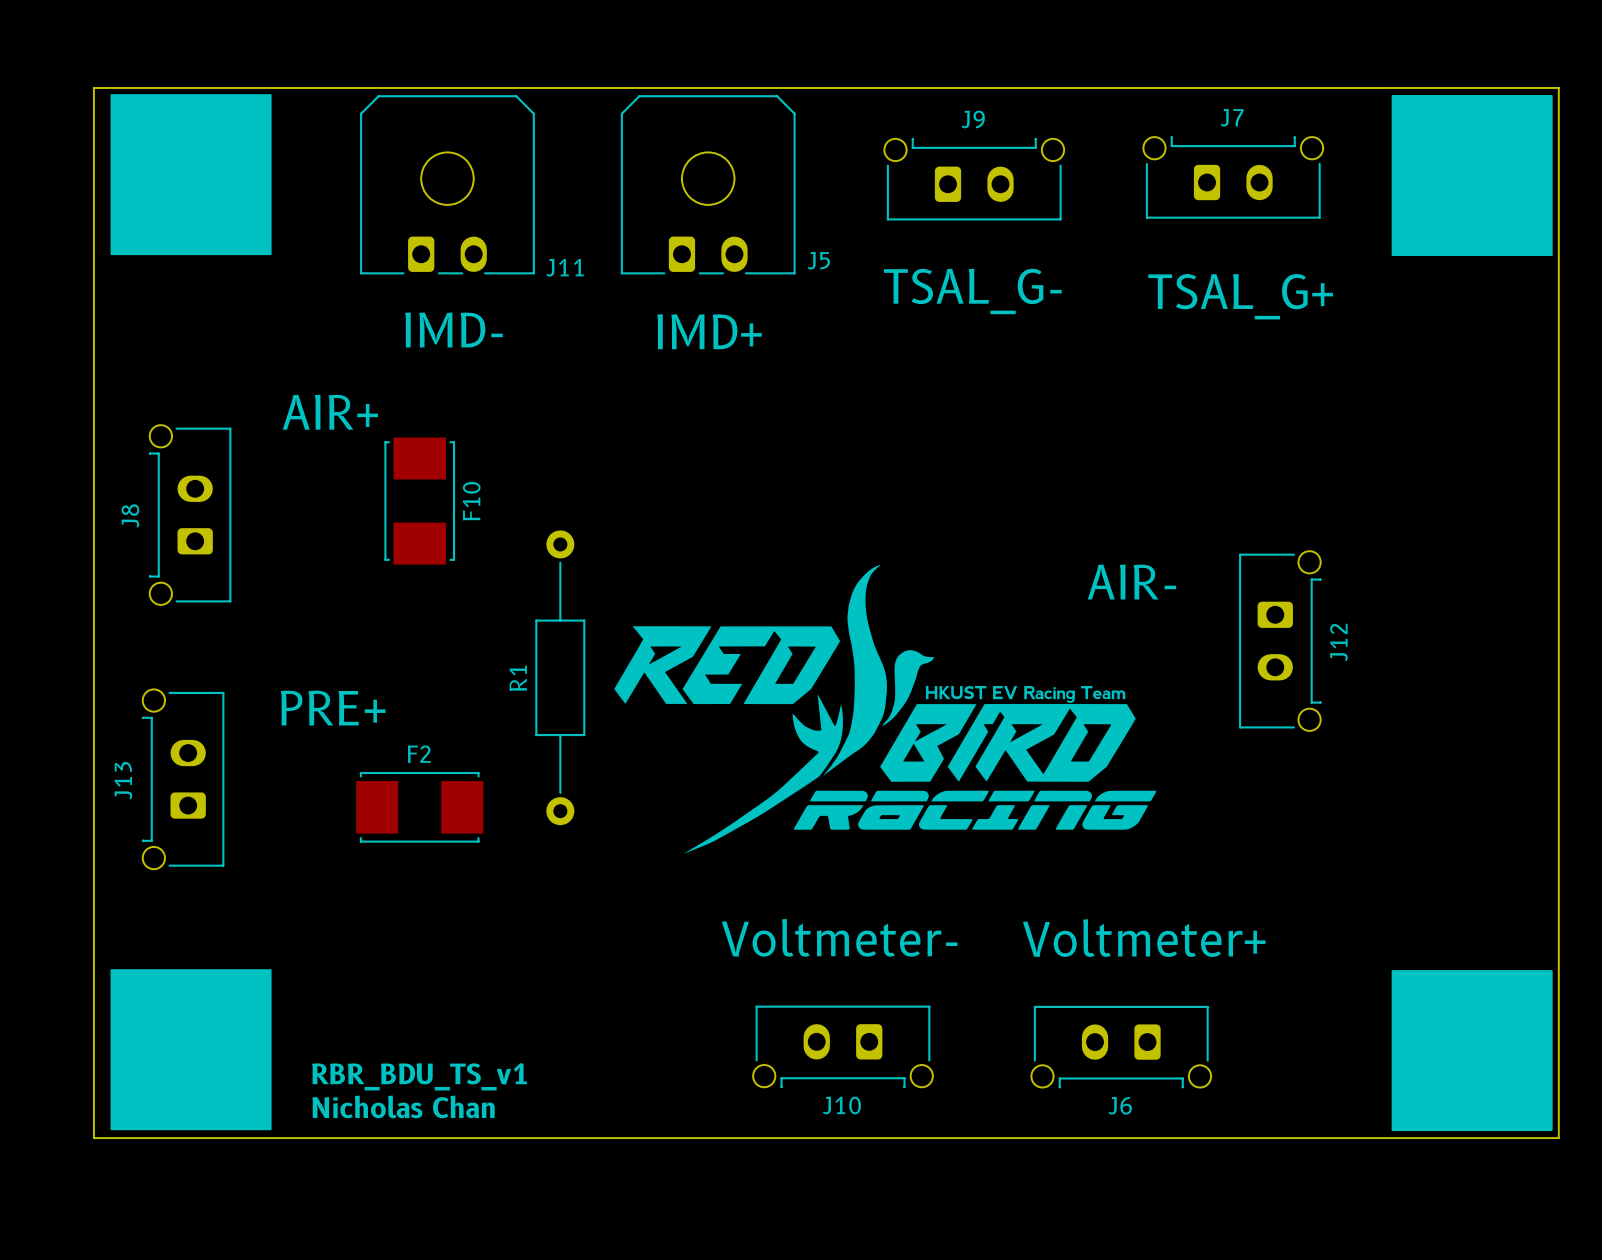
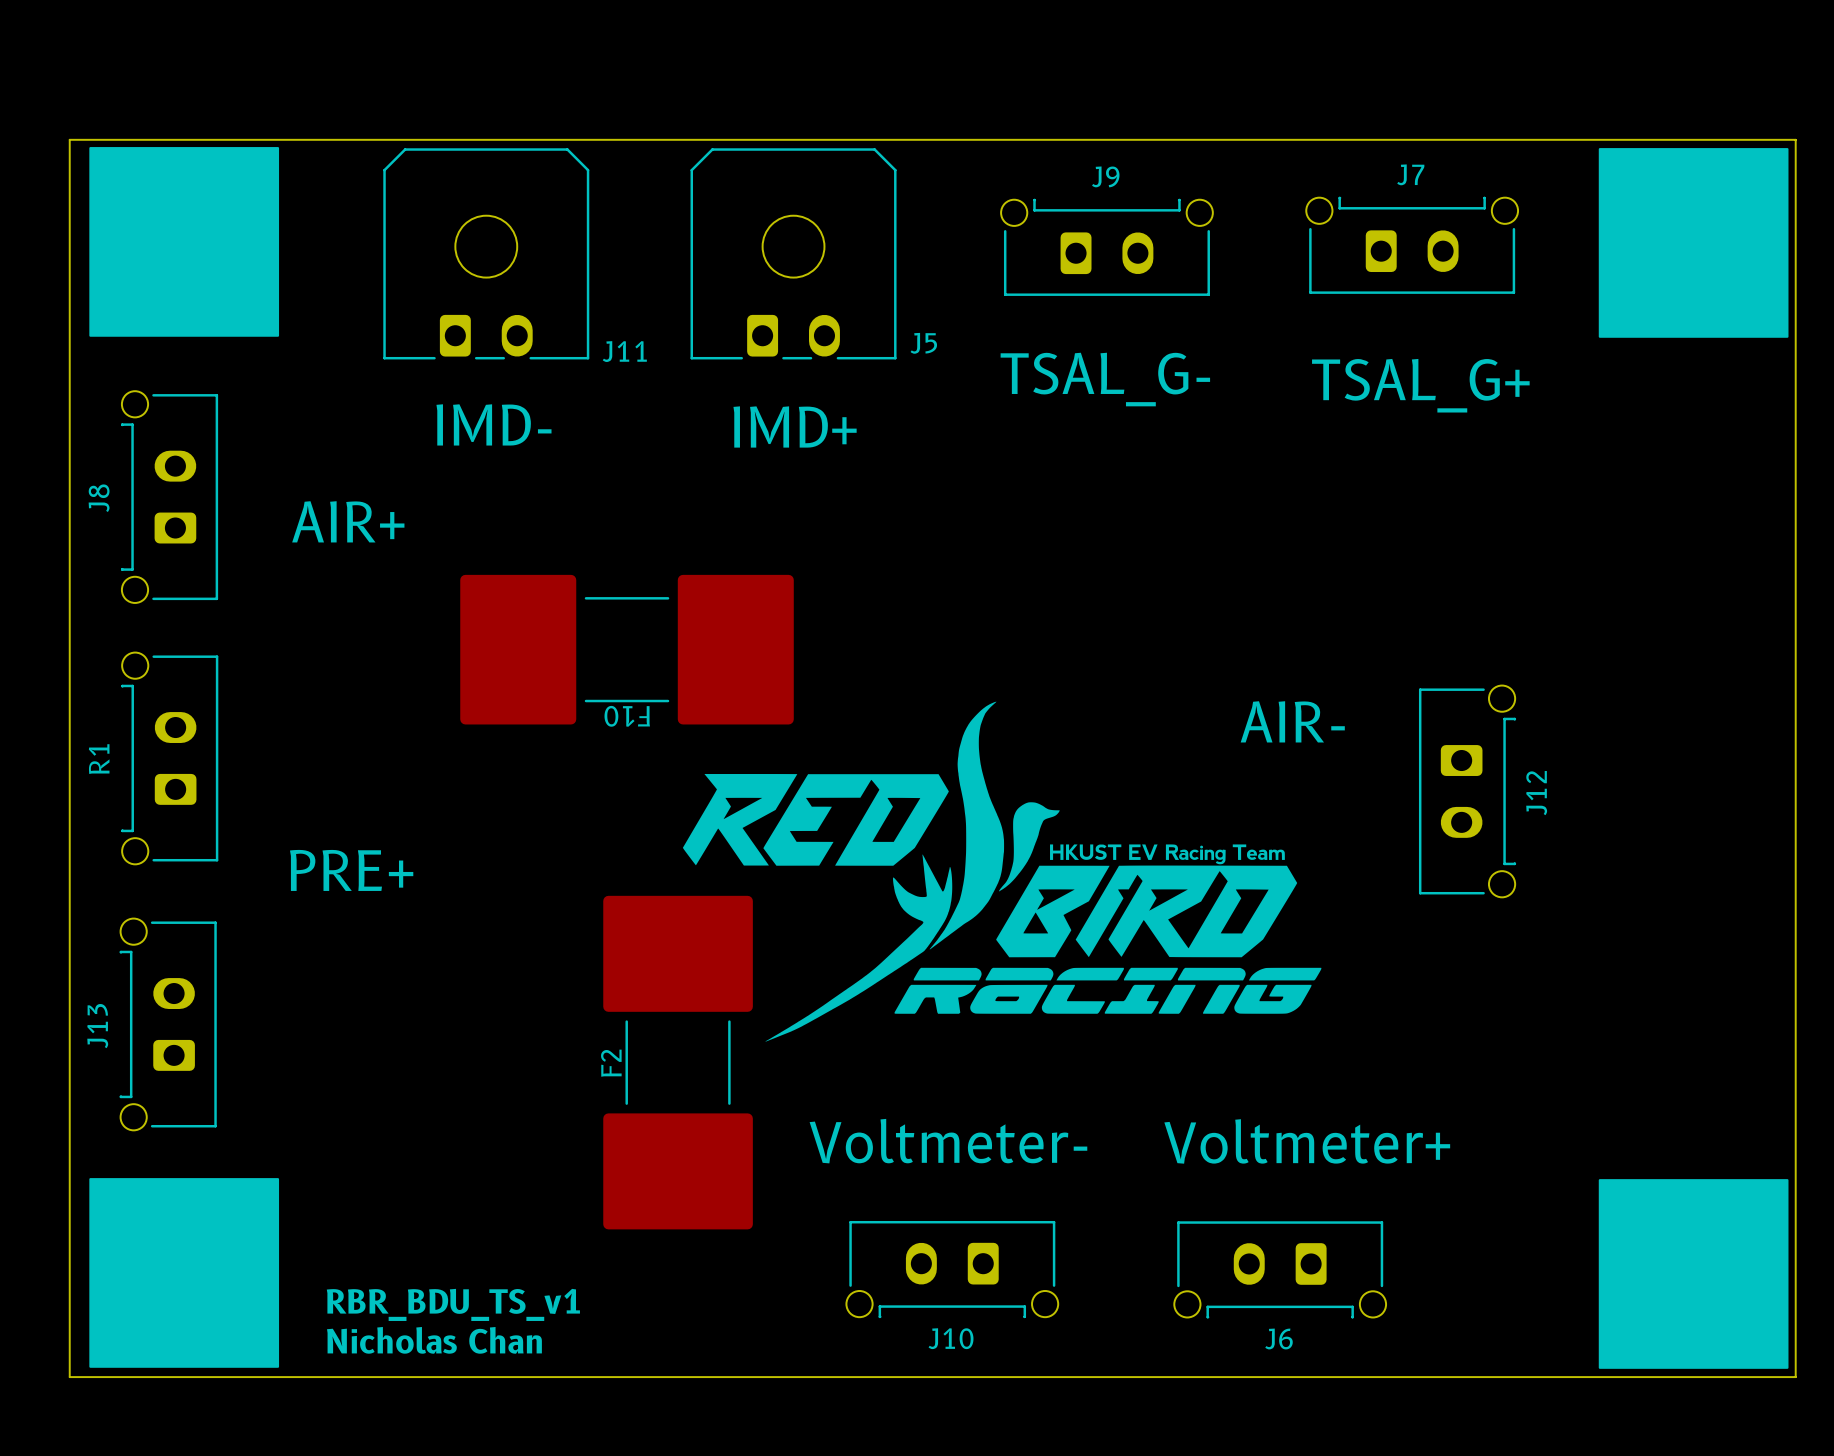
F10 footprint: [384, 437, 456, 565] -> [460, 574, 794, 725]
F10 name position: F10 (471, 501) -> F10 (627, 716)
J8 position: (190, 515) -> (169, 497)
R1 footprint: [535, 530, 586, 826] -> [121, 652, 219, 865]
F2 name position: F2 (419, 754) -> F2 (611, 1063)
F2 footprint: [356, 771, 484, 843] -> [603, 895, 753, 1230]
J13 position: (183, 779) -> (168, 1024)

